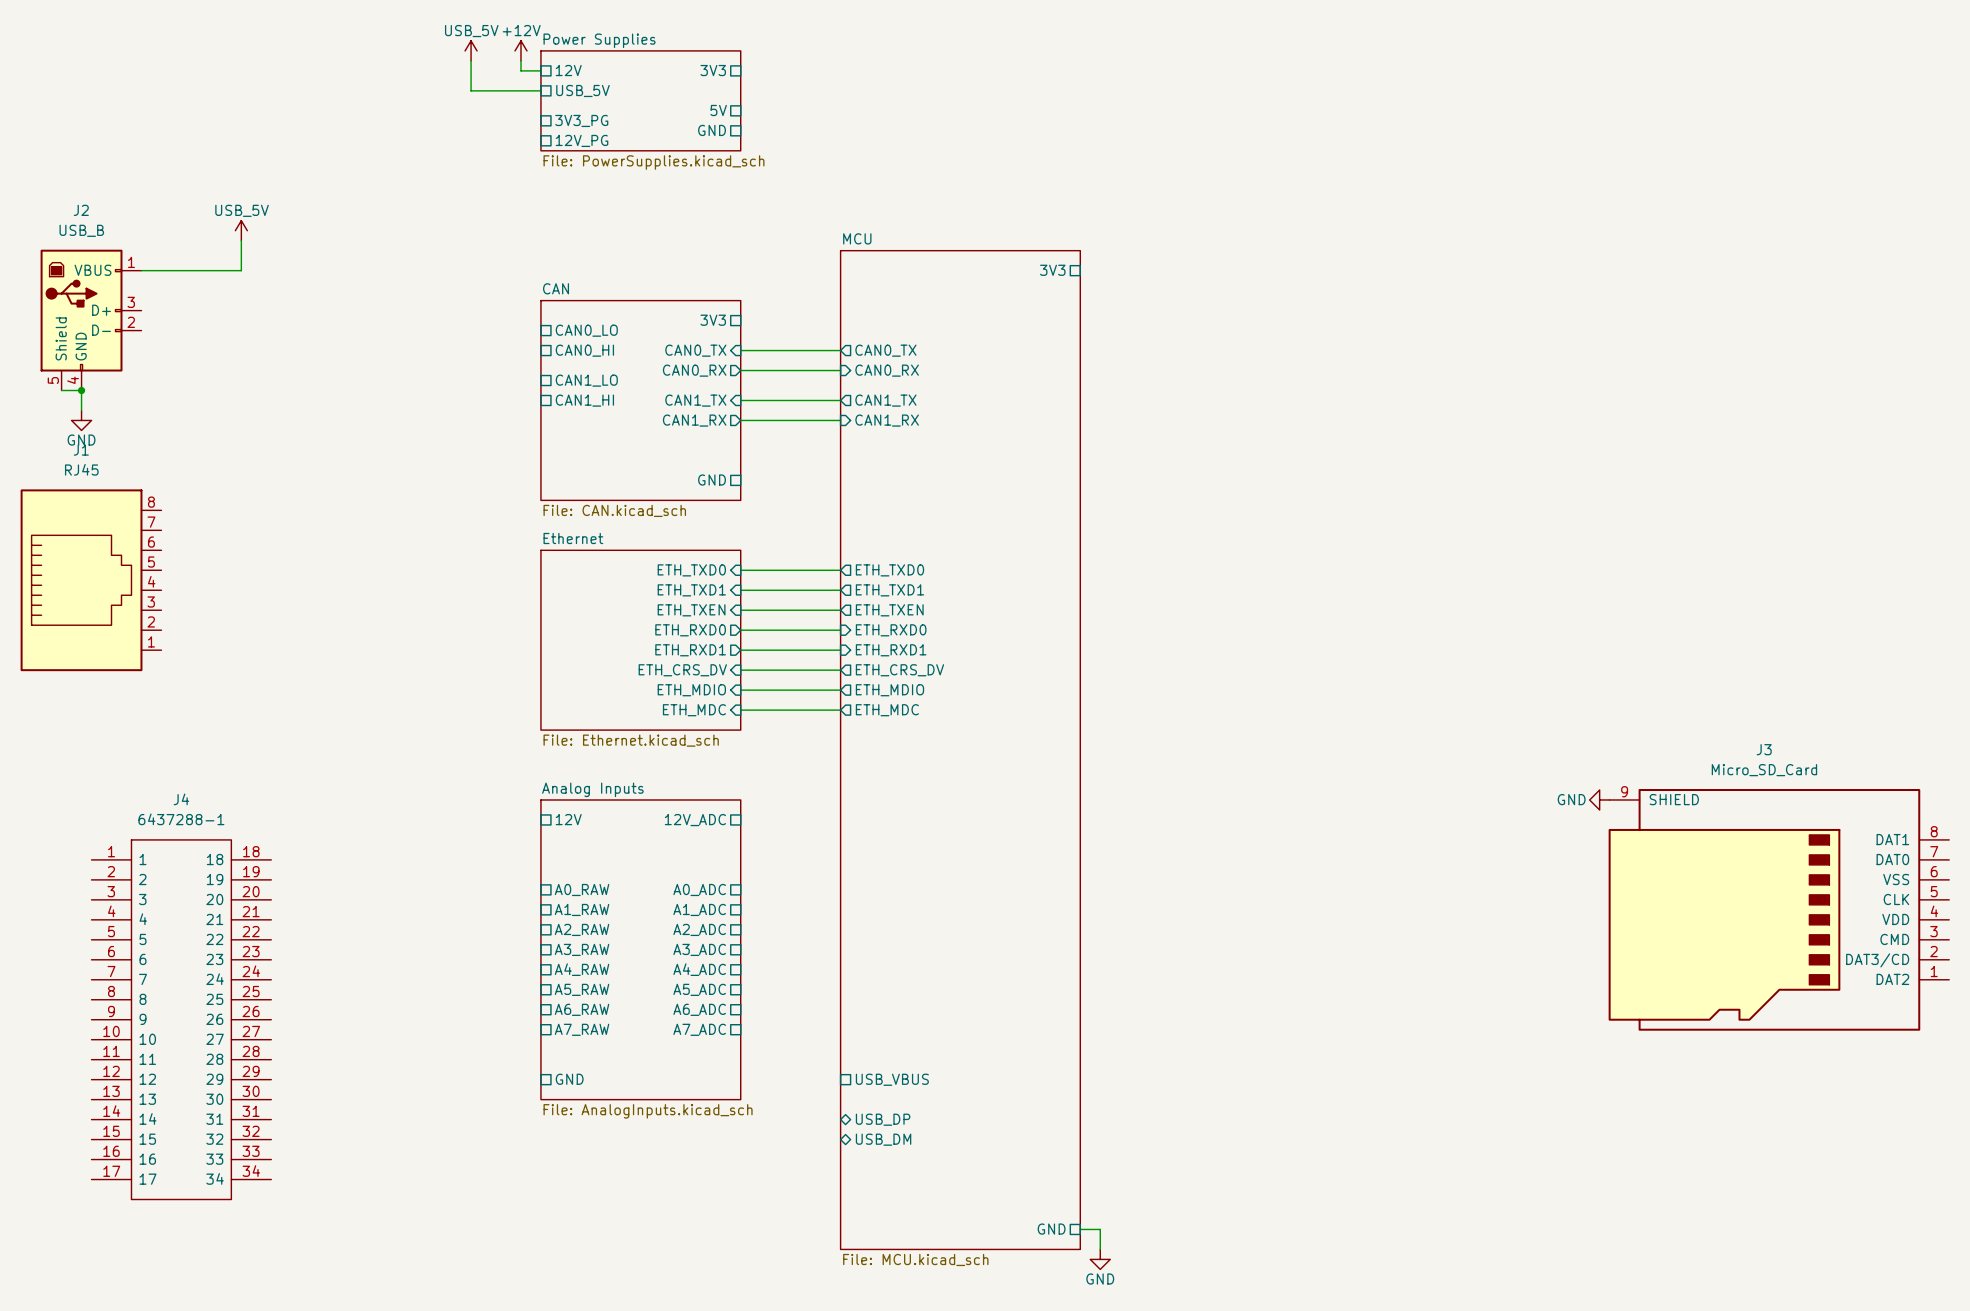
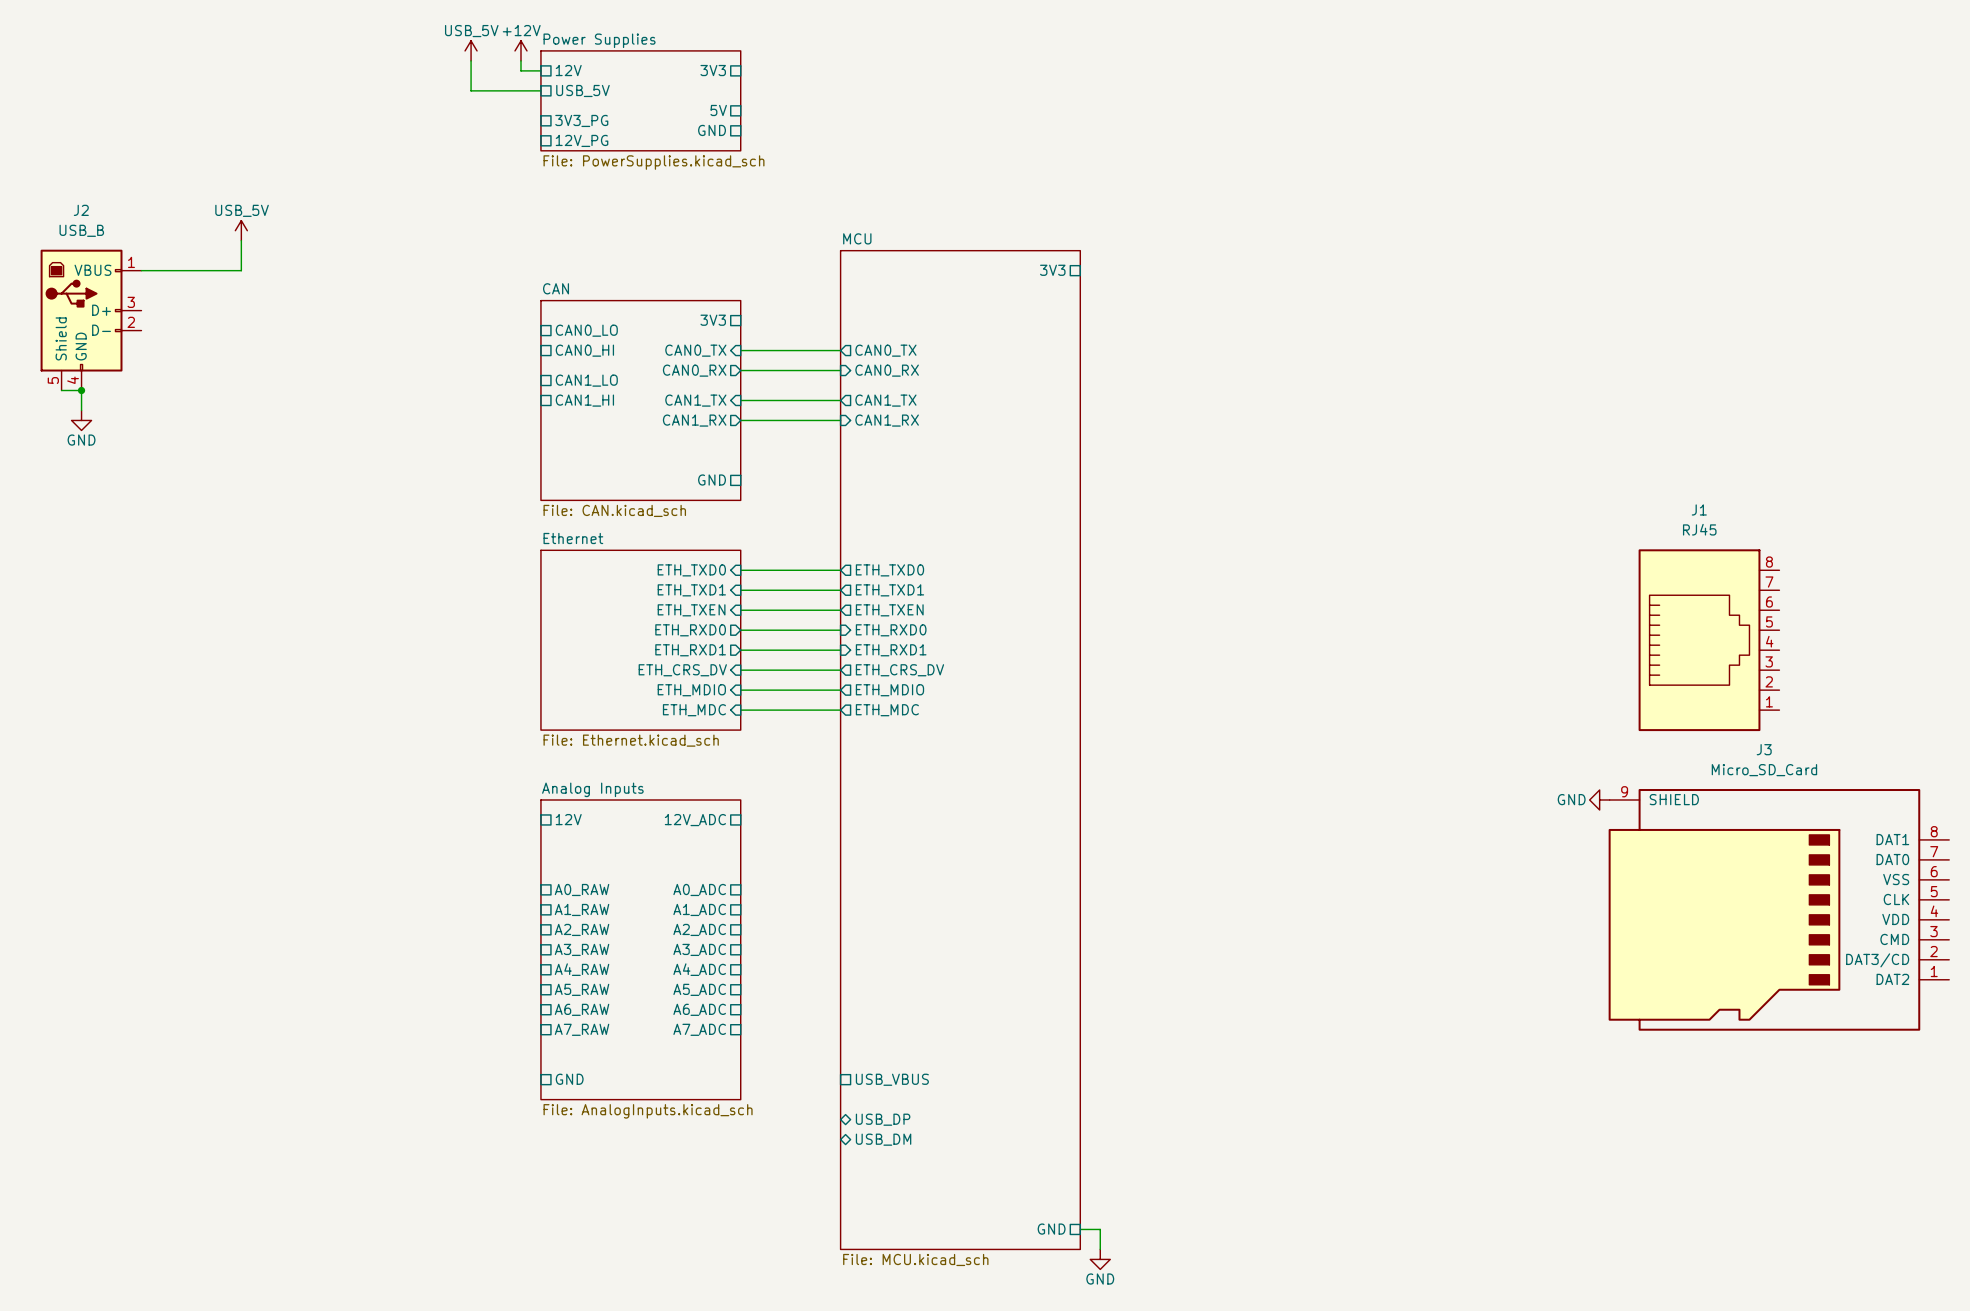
J1 position: (91, 580) -> (1709, 640)
J4: 6437288-1 (181, 1019) -> none

